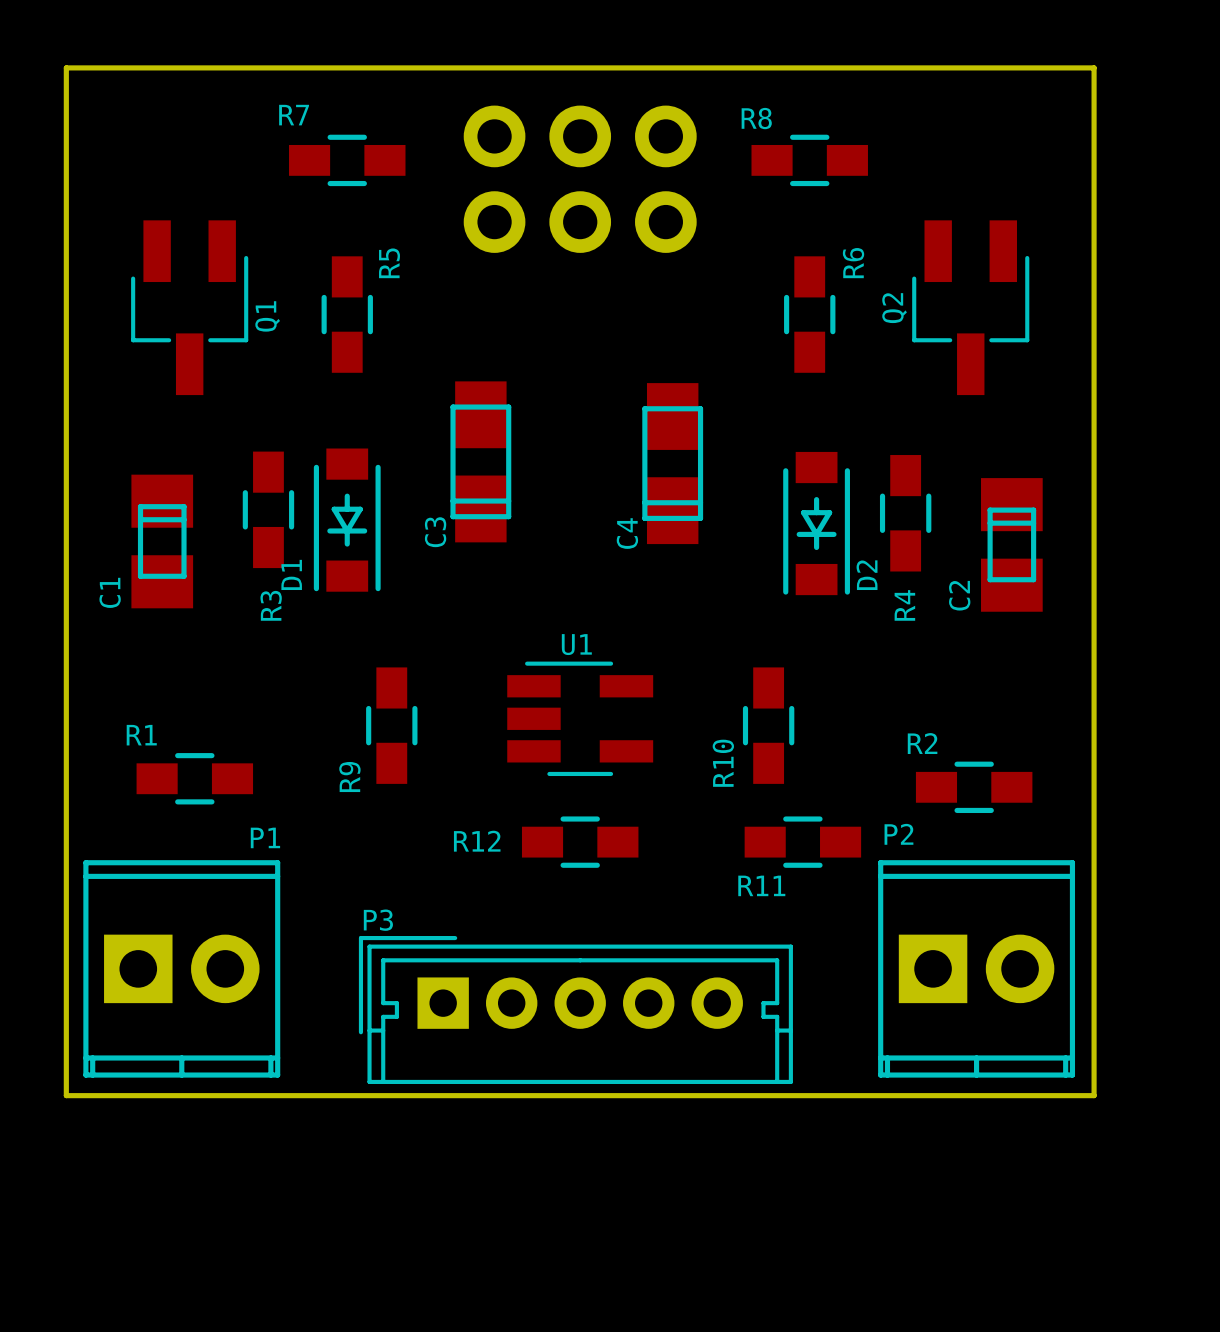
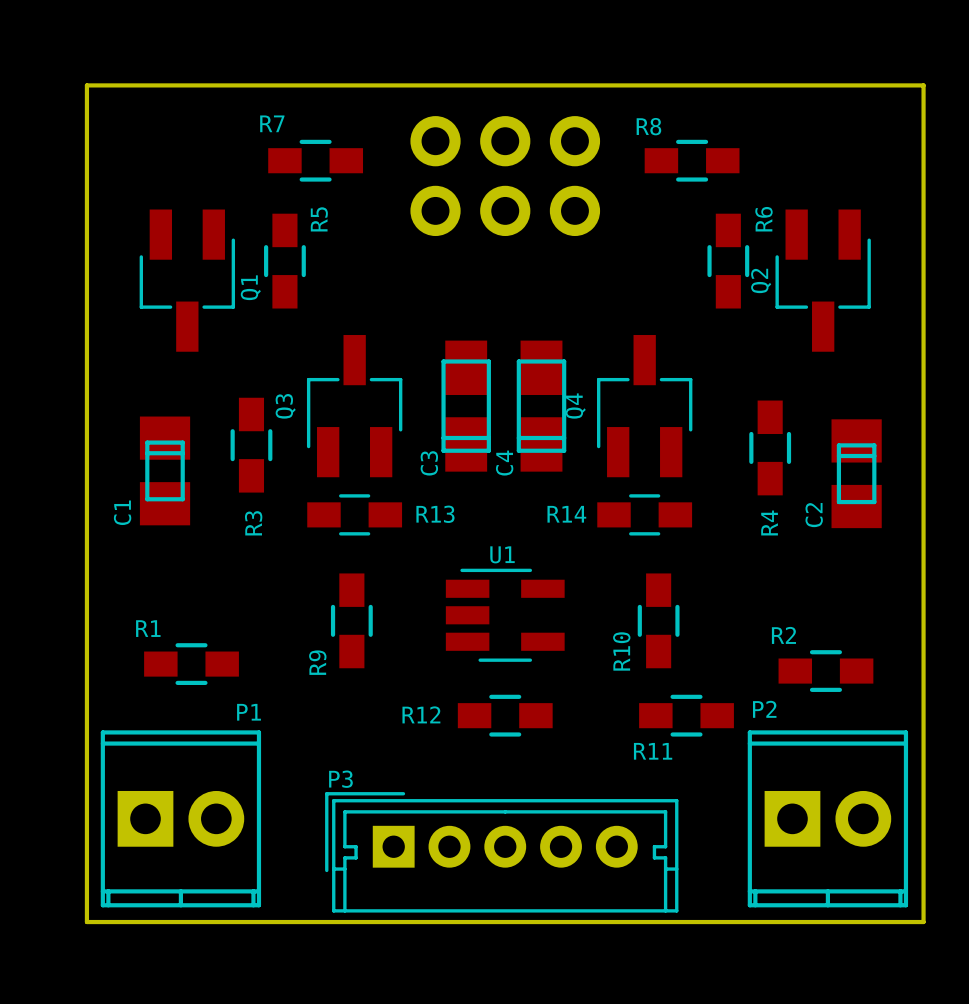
R5 position: (347, 314) -> (284, 261)
R6 position: (809, 314) -> (728, 261)
Q3: none -> (354, 406)
C3 position: (480, 461) -> (466, 406)
Q4: none -> (644, 406)
C4 position: (672, 463) -> (541, 406)
D1: (347, 520) -> none
D2: (816, 523) -> none
R13: none -> (354, 514)
R14: none -> (644, 514)

